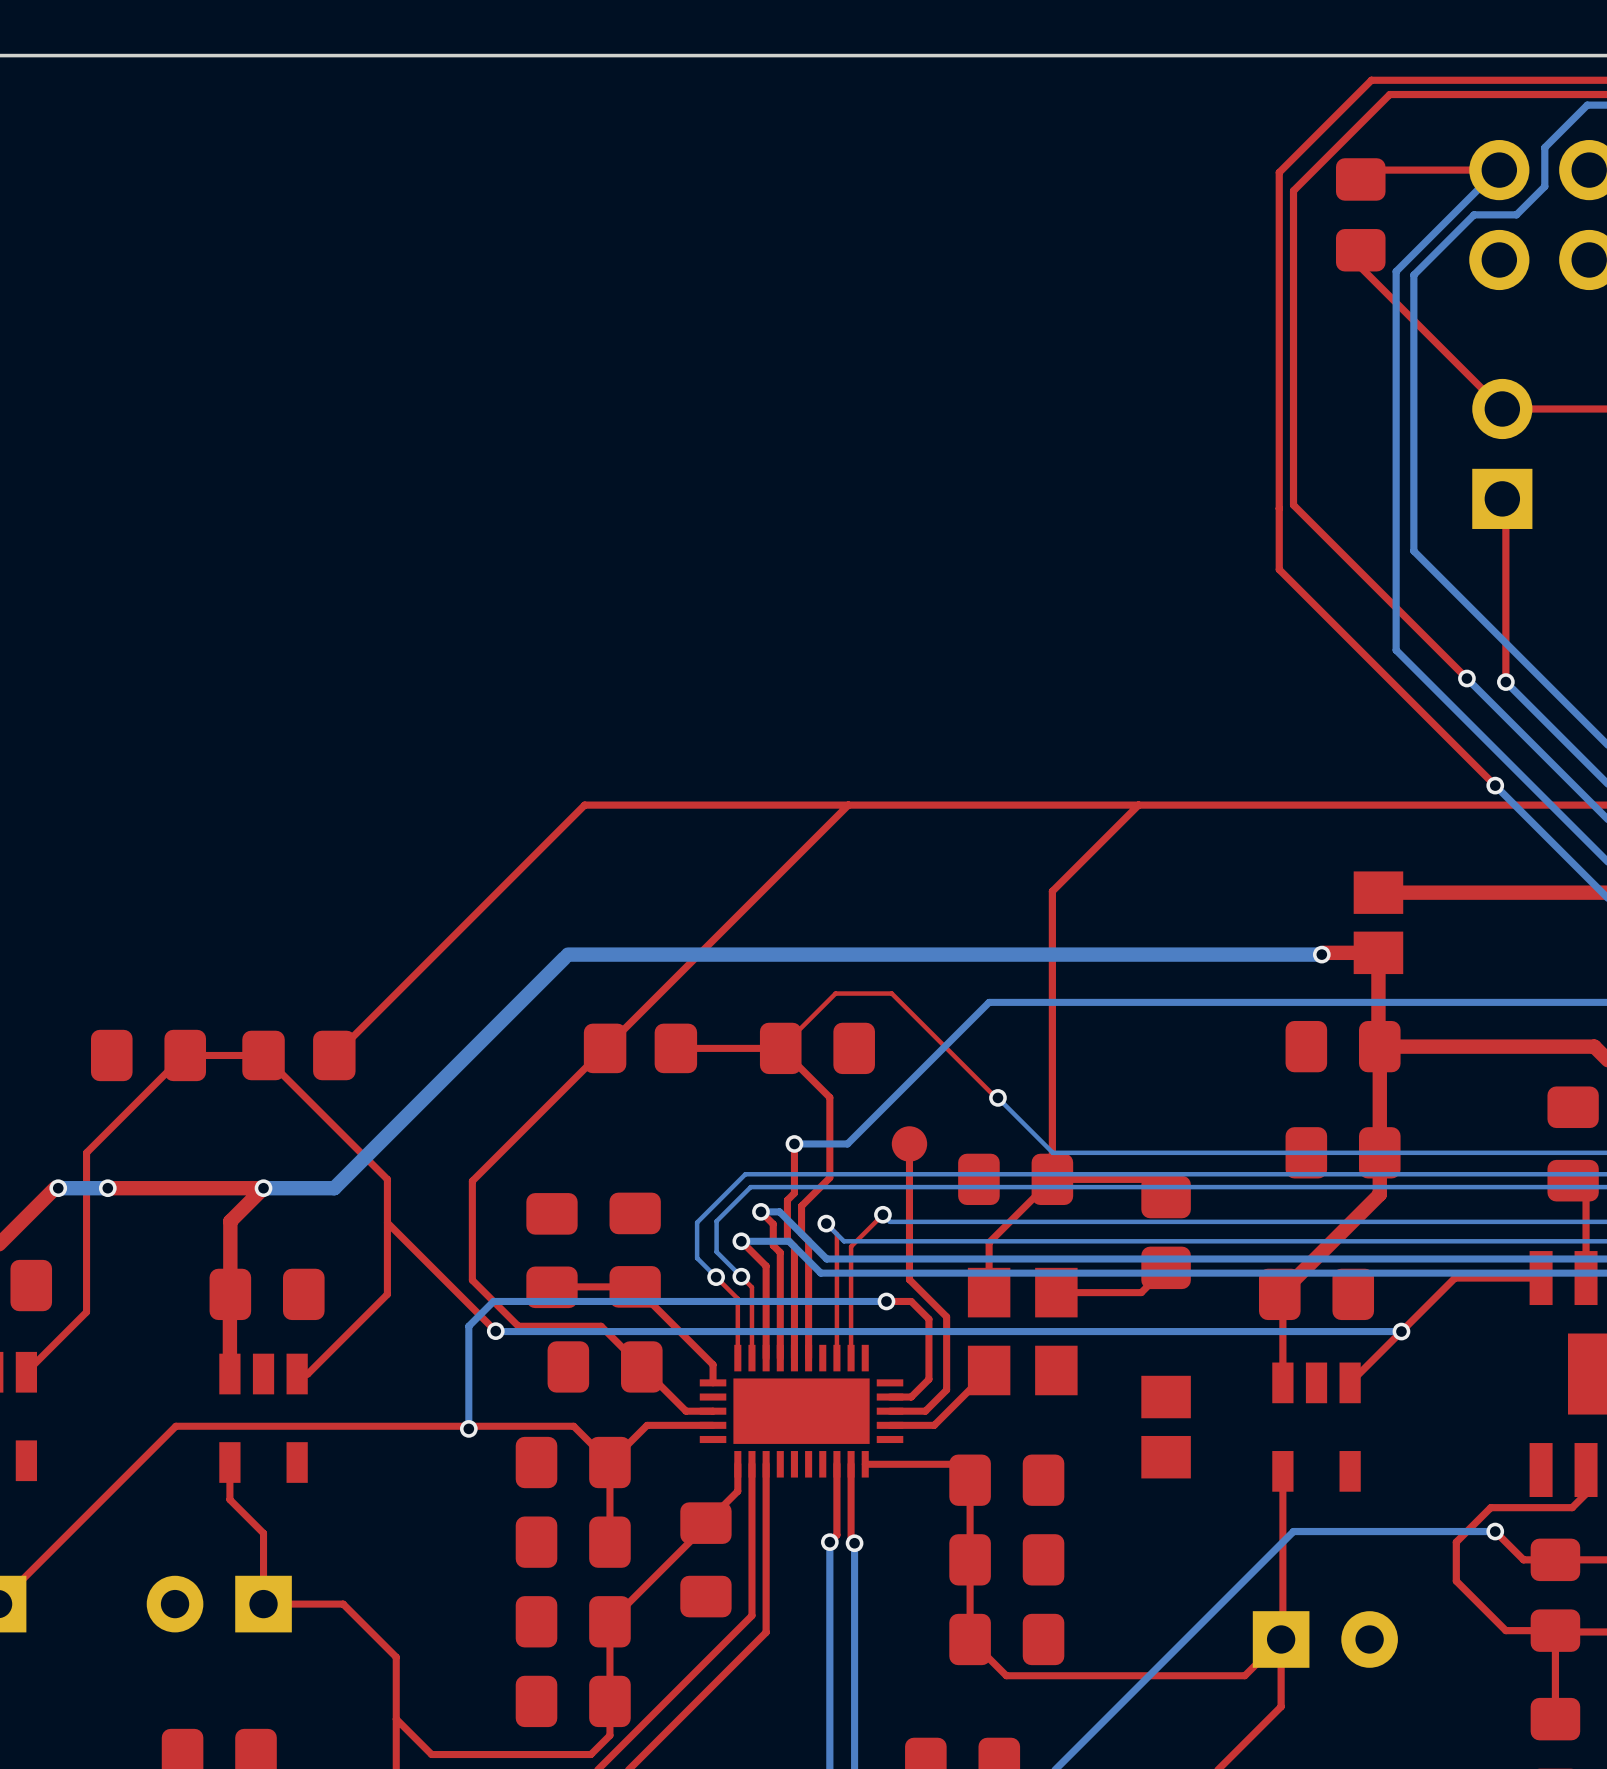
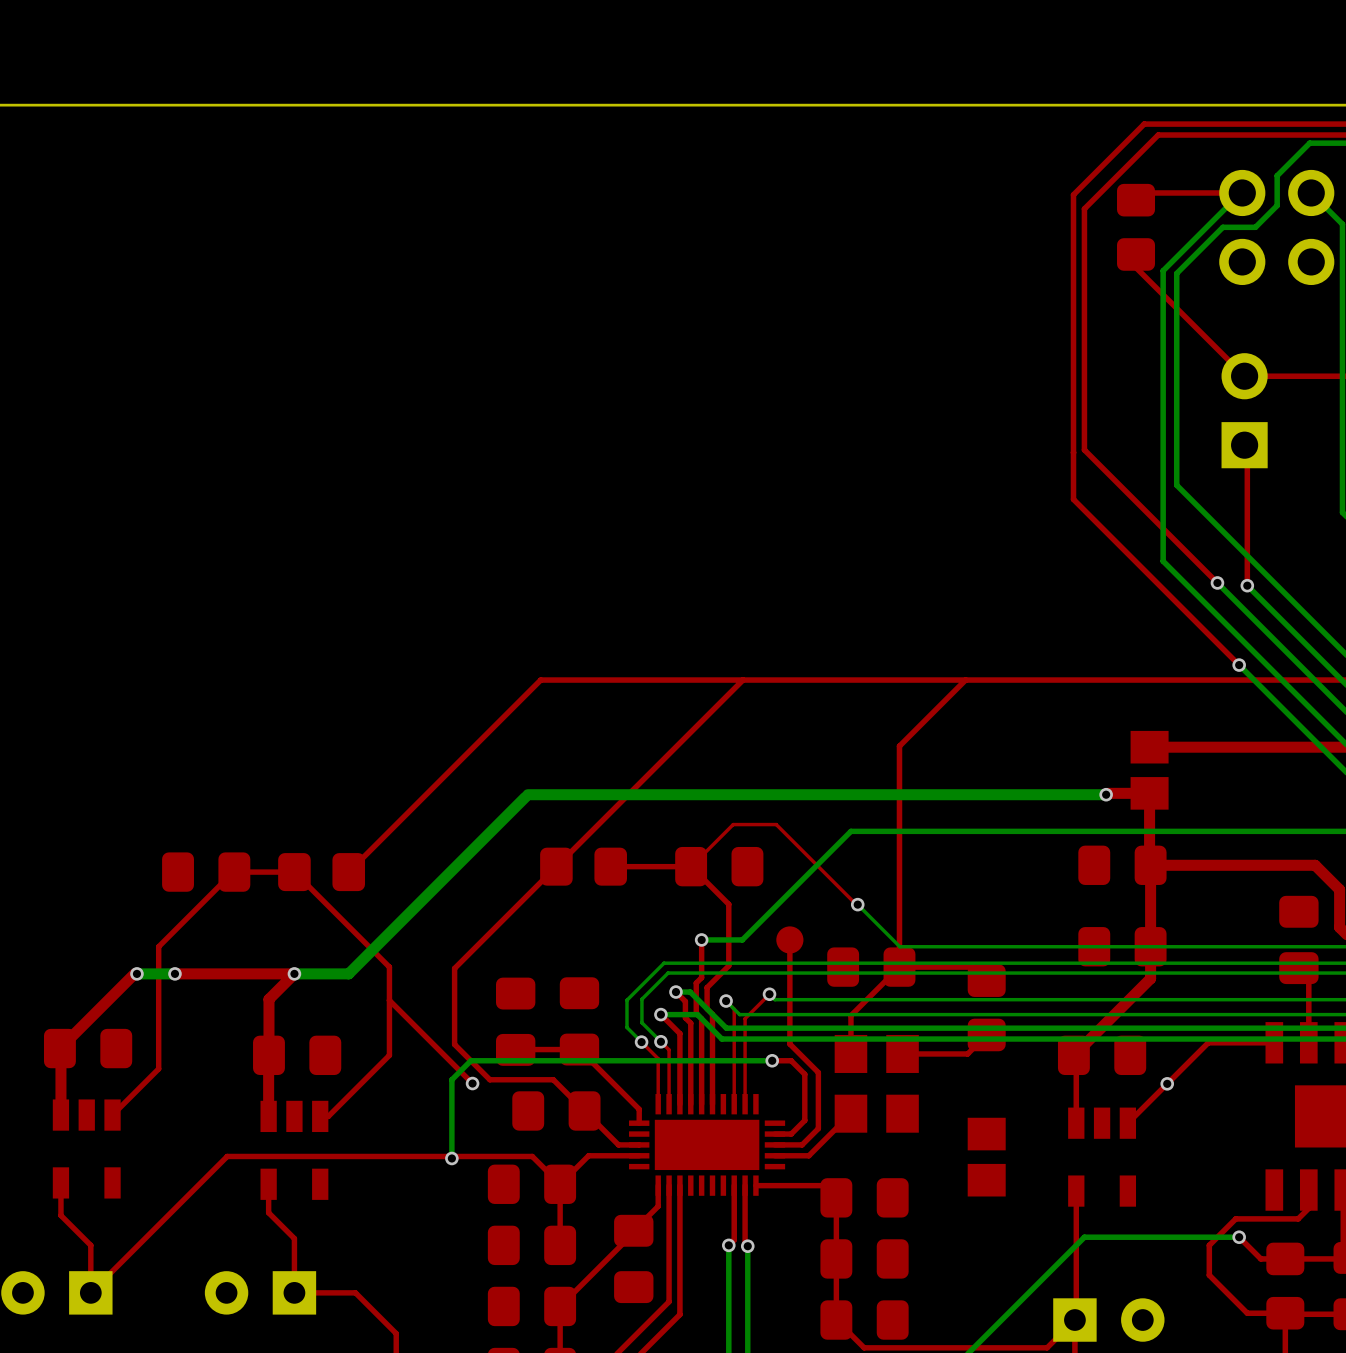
bottom track: (1401, 1331) (496, 1331) -> none

